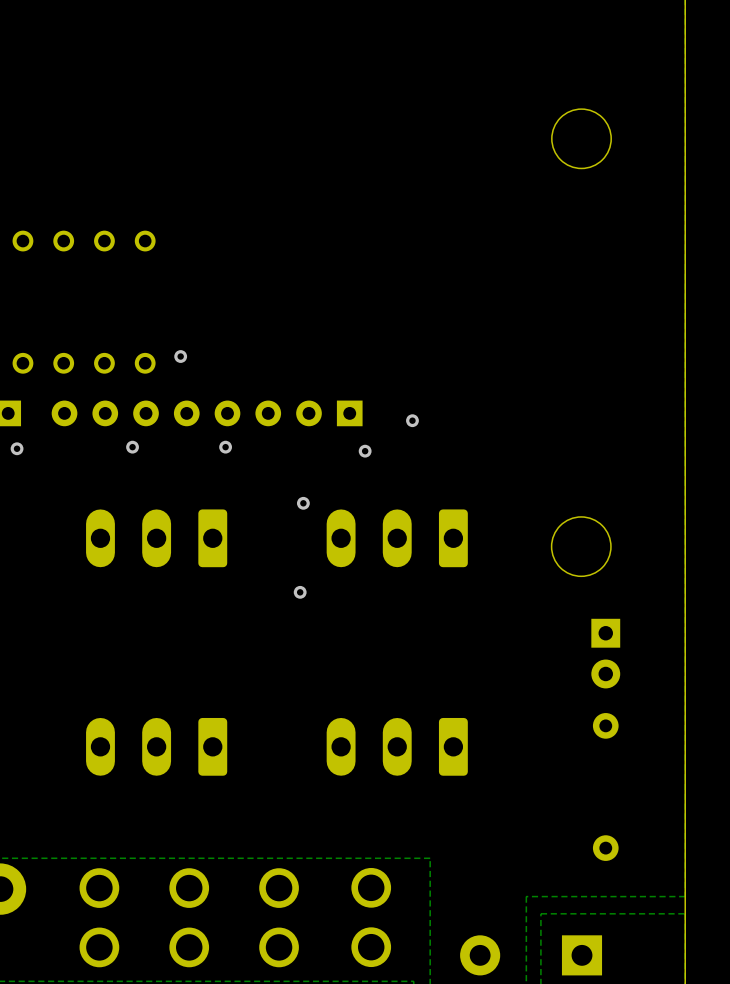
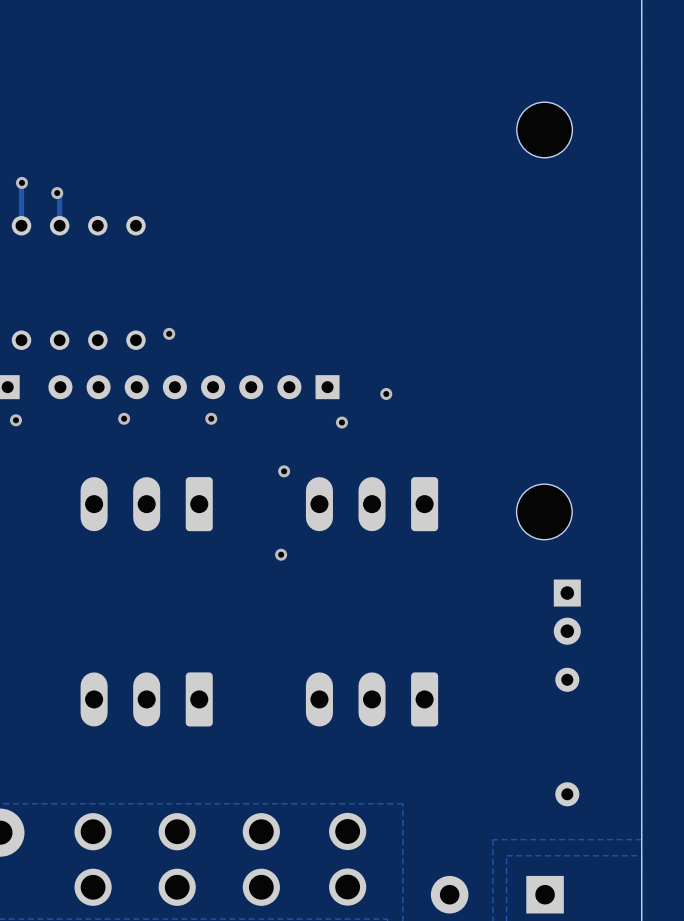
track: none -> (21, 182) (21, 225)
via: none -> (21, 182)
track: none -> (57, 193) (59, 195) (59, 225)
via: none -> (57, 193)

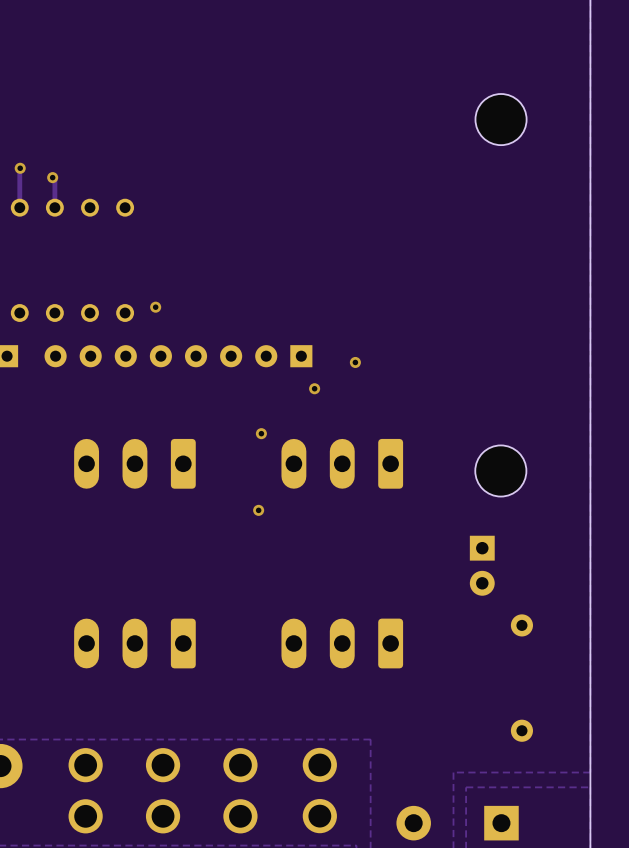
via: (124, 418) -> none
via: (211, 418) -> none
via: (15, 420) -> none
part position: (567, 612) -> (482, 565)

